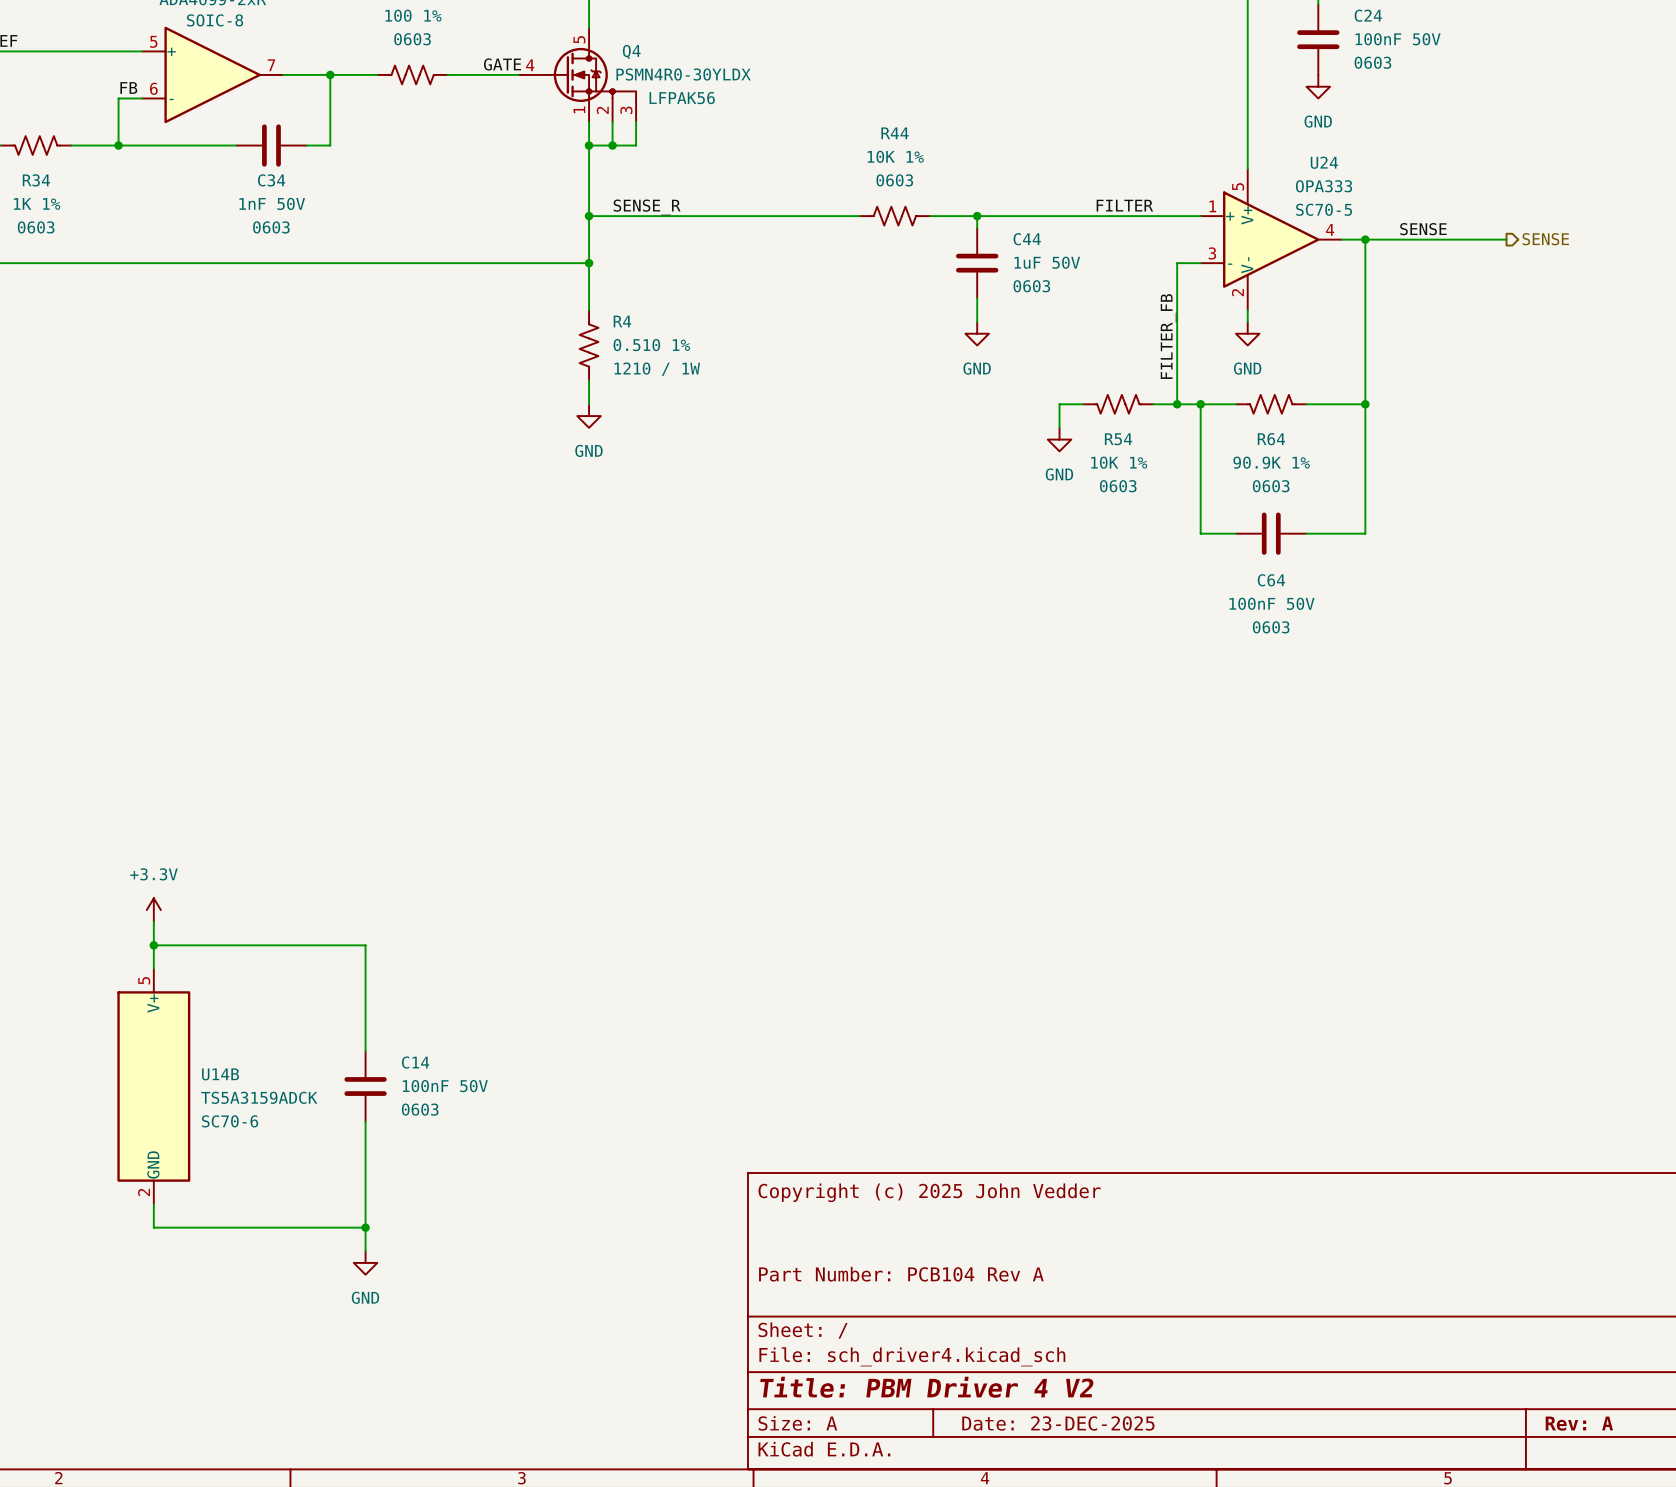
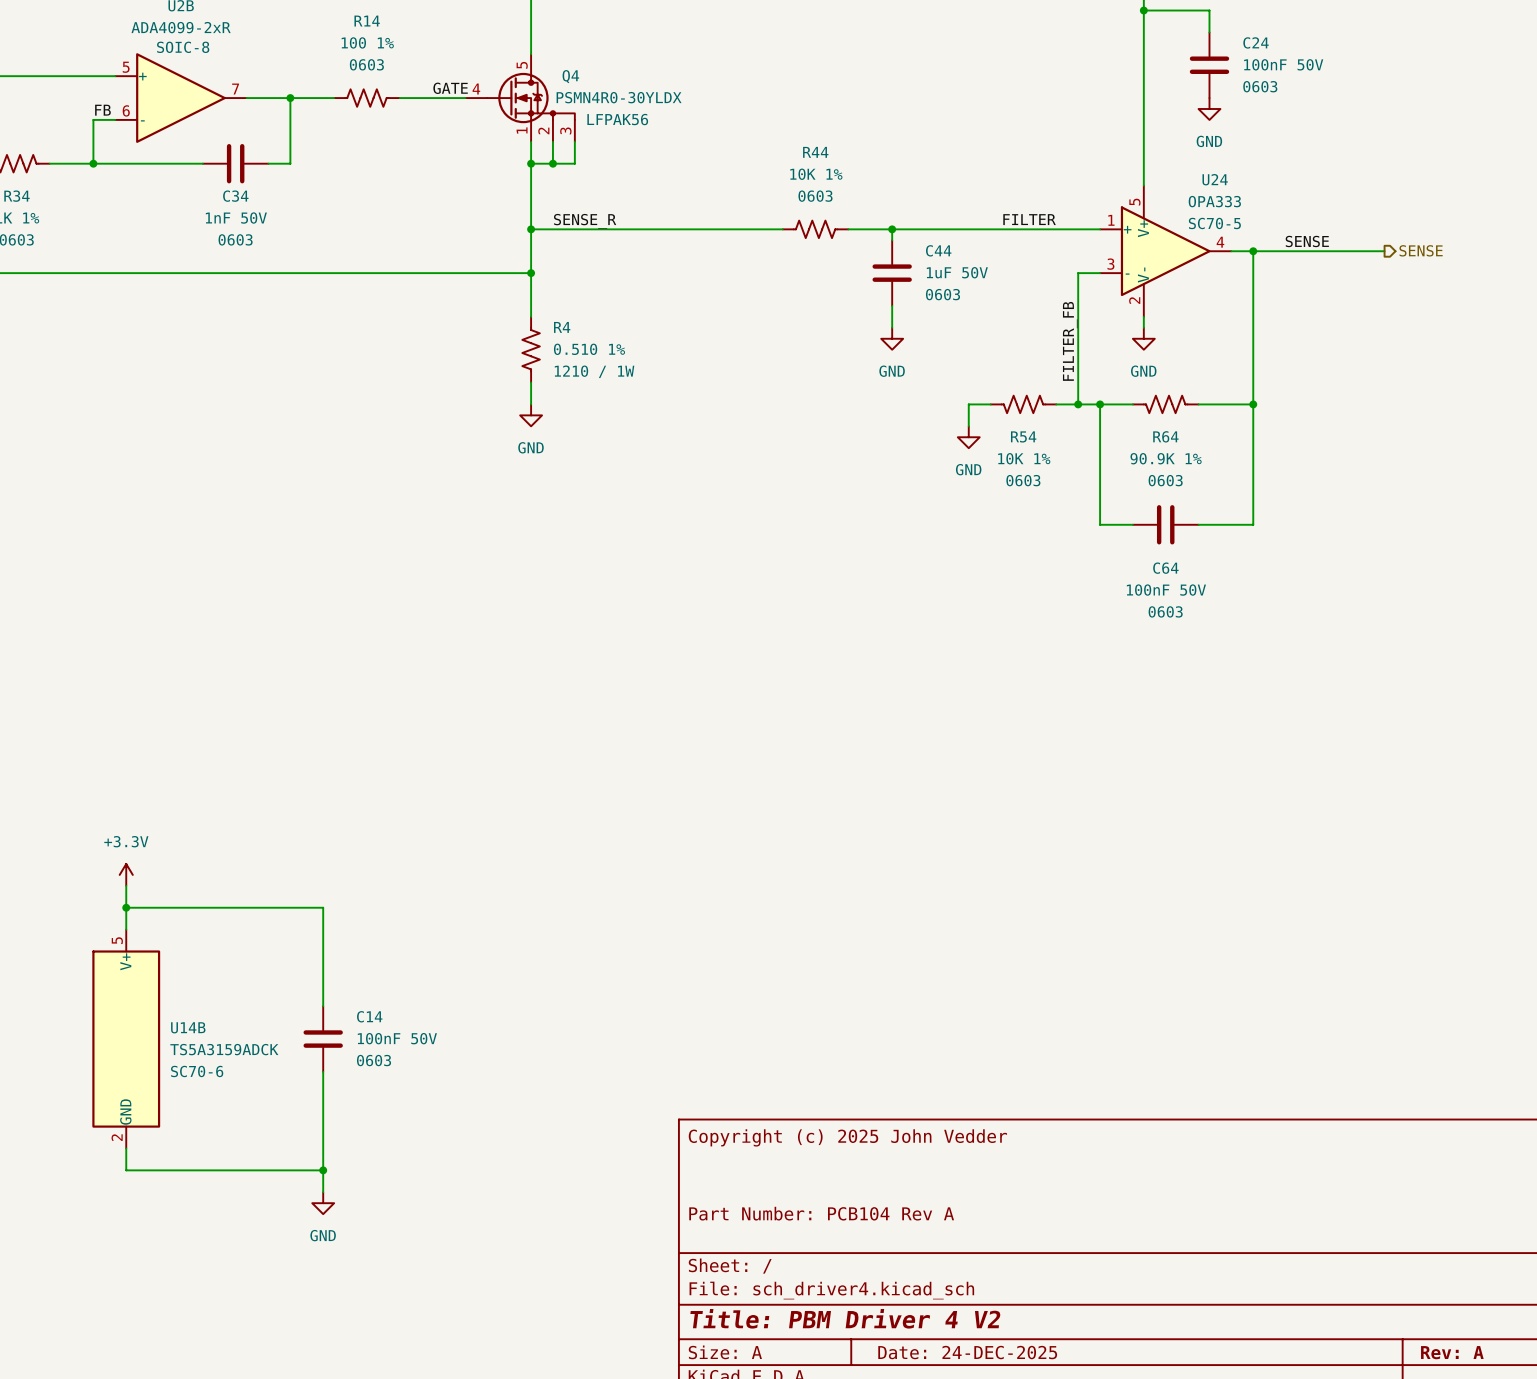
title block: Date: 23-DEC-2025 (1058, 1423) -> Date: 24-DEC-2025 (967, 1352)

